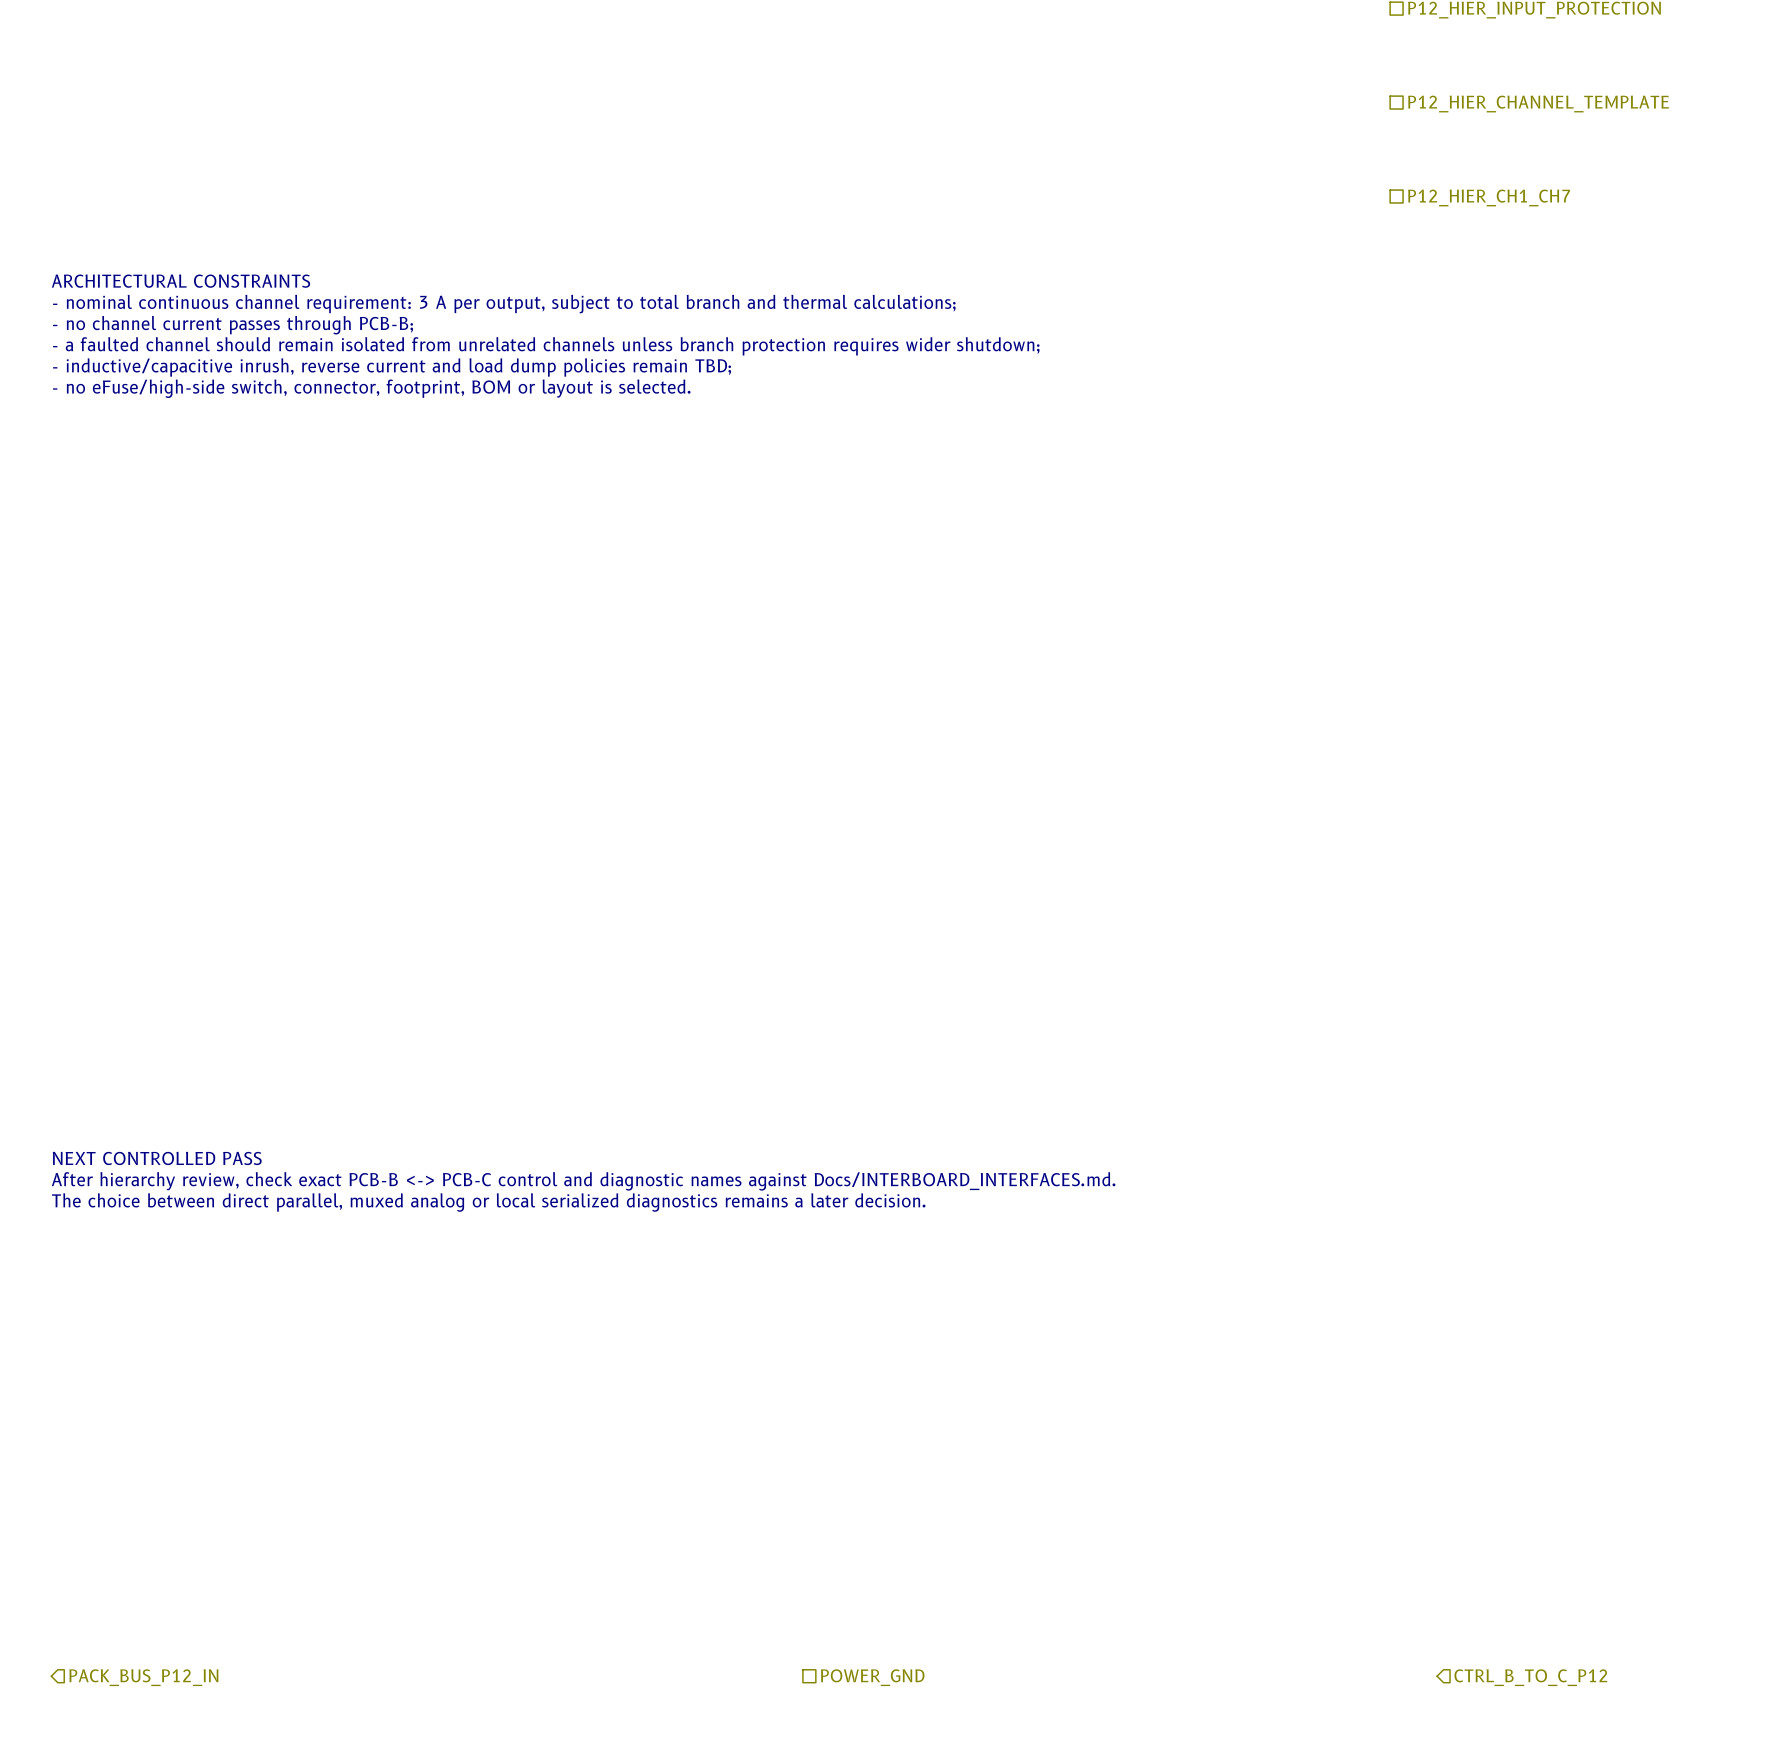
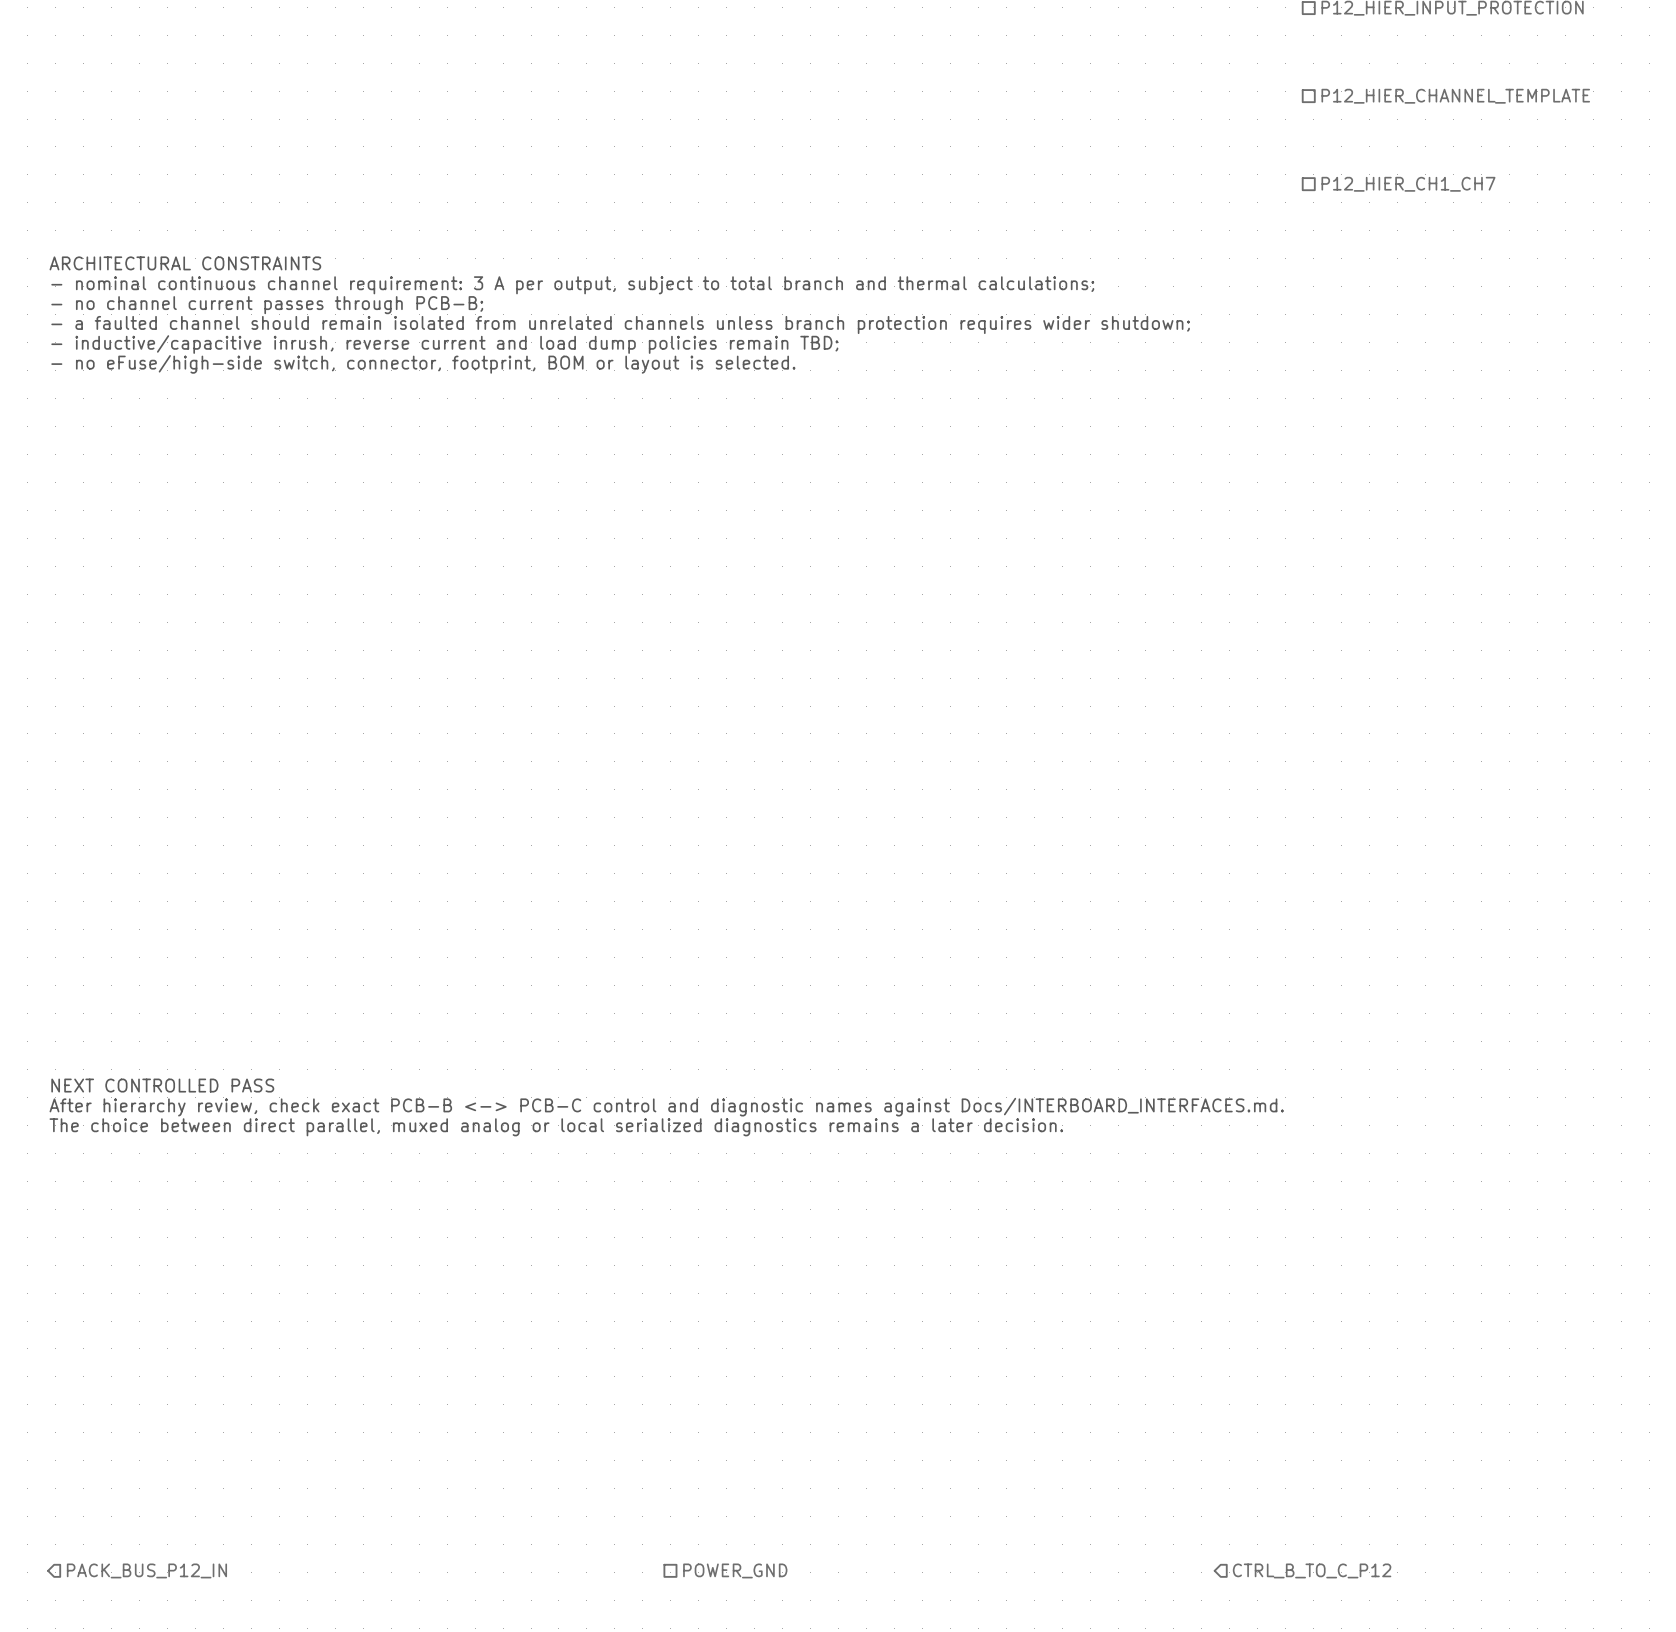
hierarchical label position: POWER_GND (872, 1677) -> POWER_GND (735, 1570)
hierarchical label position: CTRL_B_TO_C_P12 (1530, 1677) -> CTRL_B_TO_C_P12 (1312, 1570)

